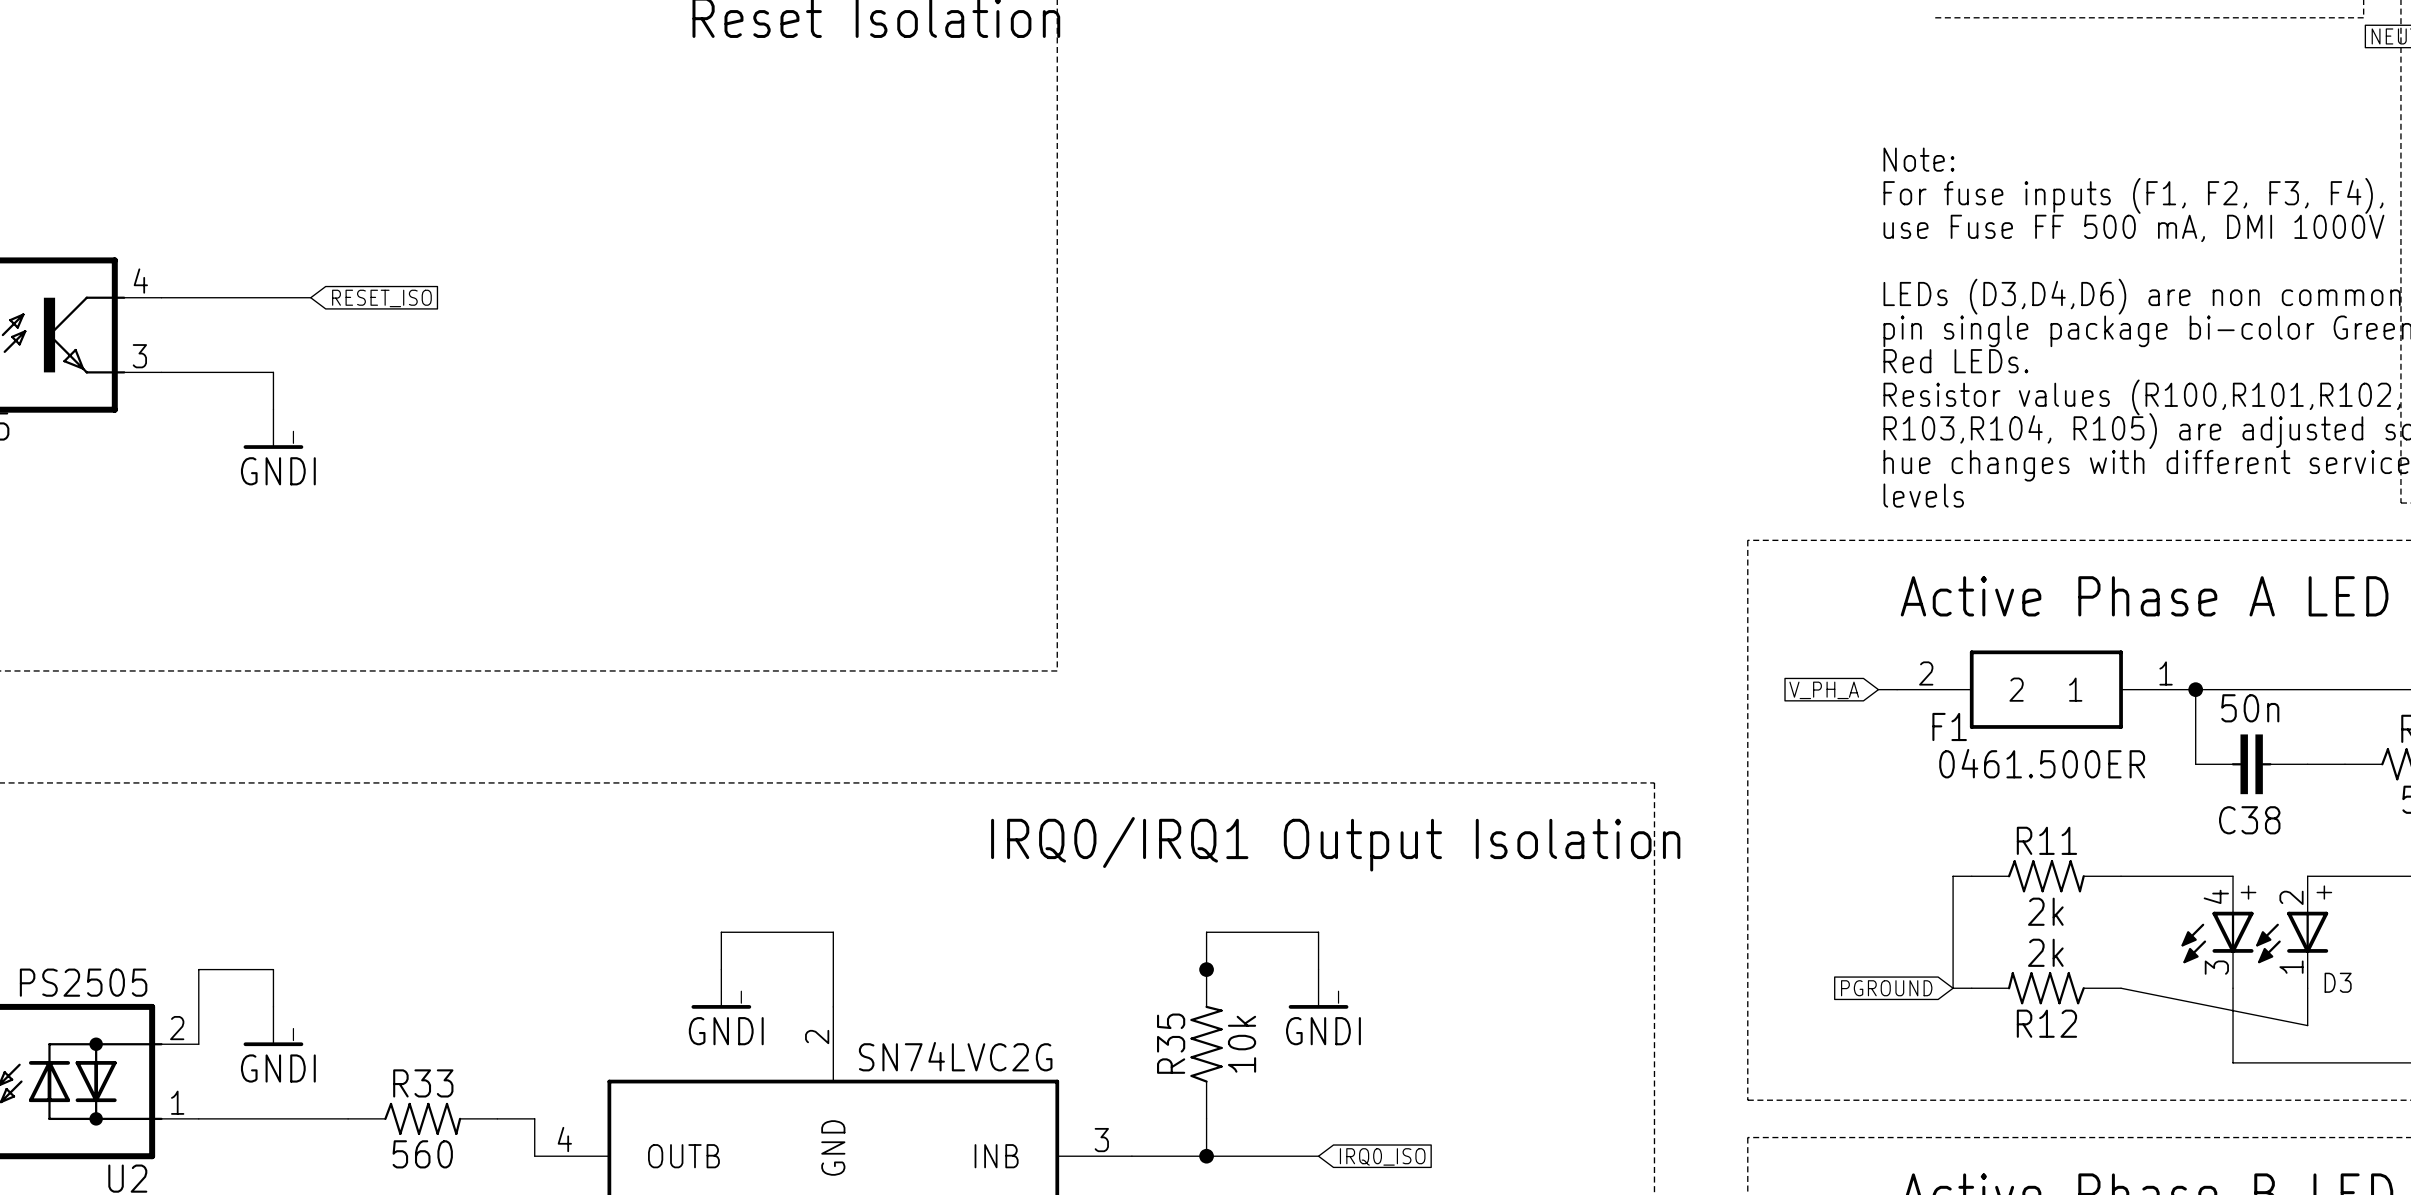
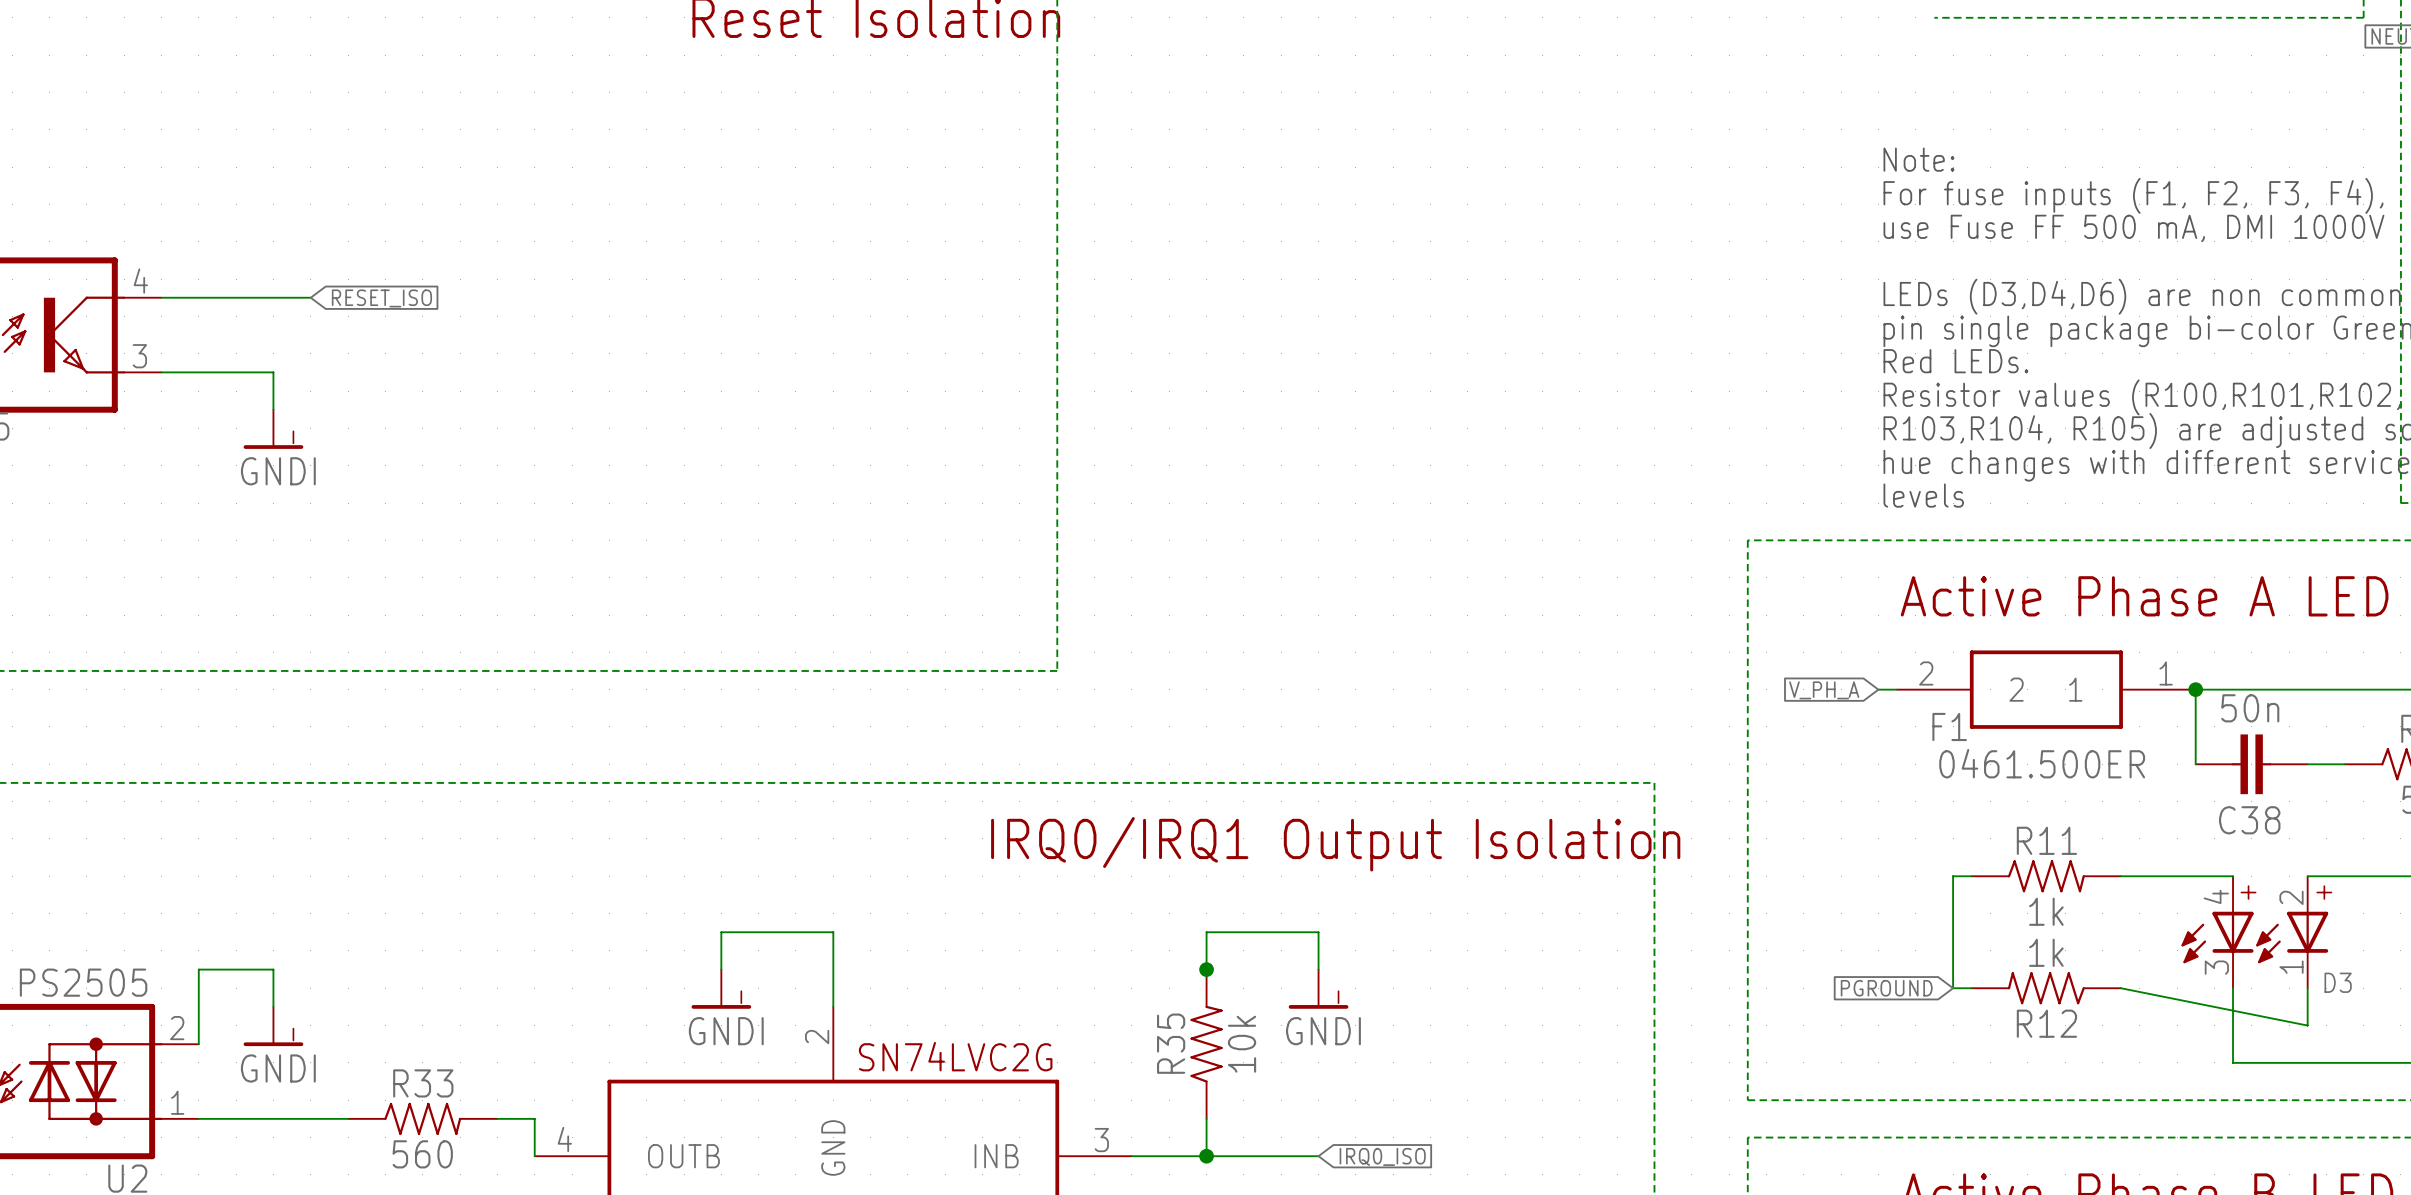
R11 value: 2k (2045, 911) -> 1k (2046, 911)
R12 value: 2k (2045, 952) -> 1k (2046, 952)

